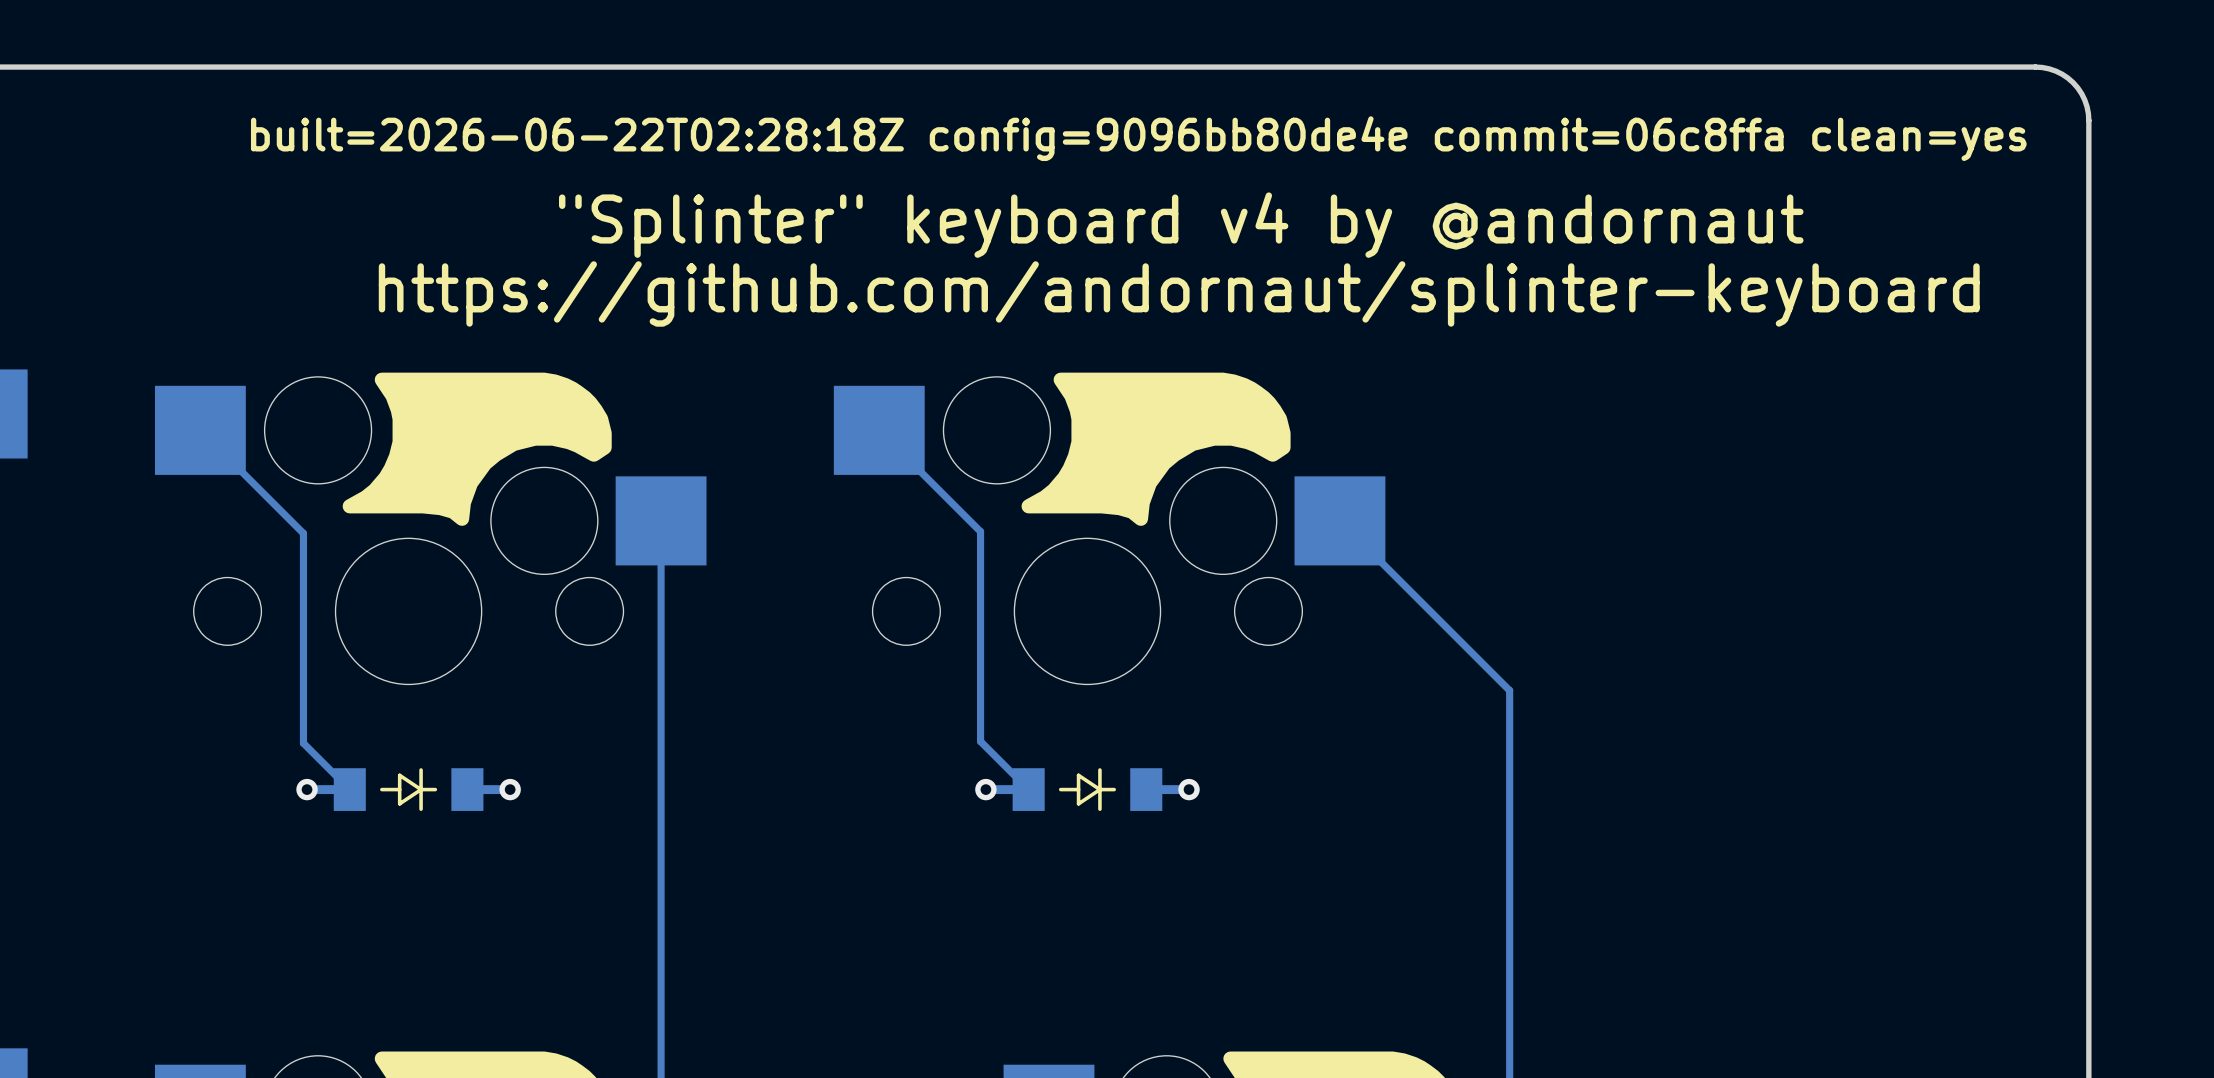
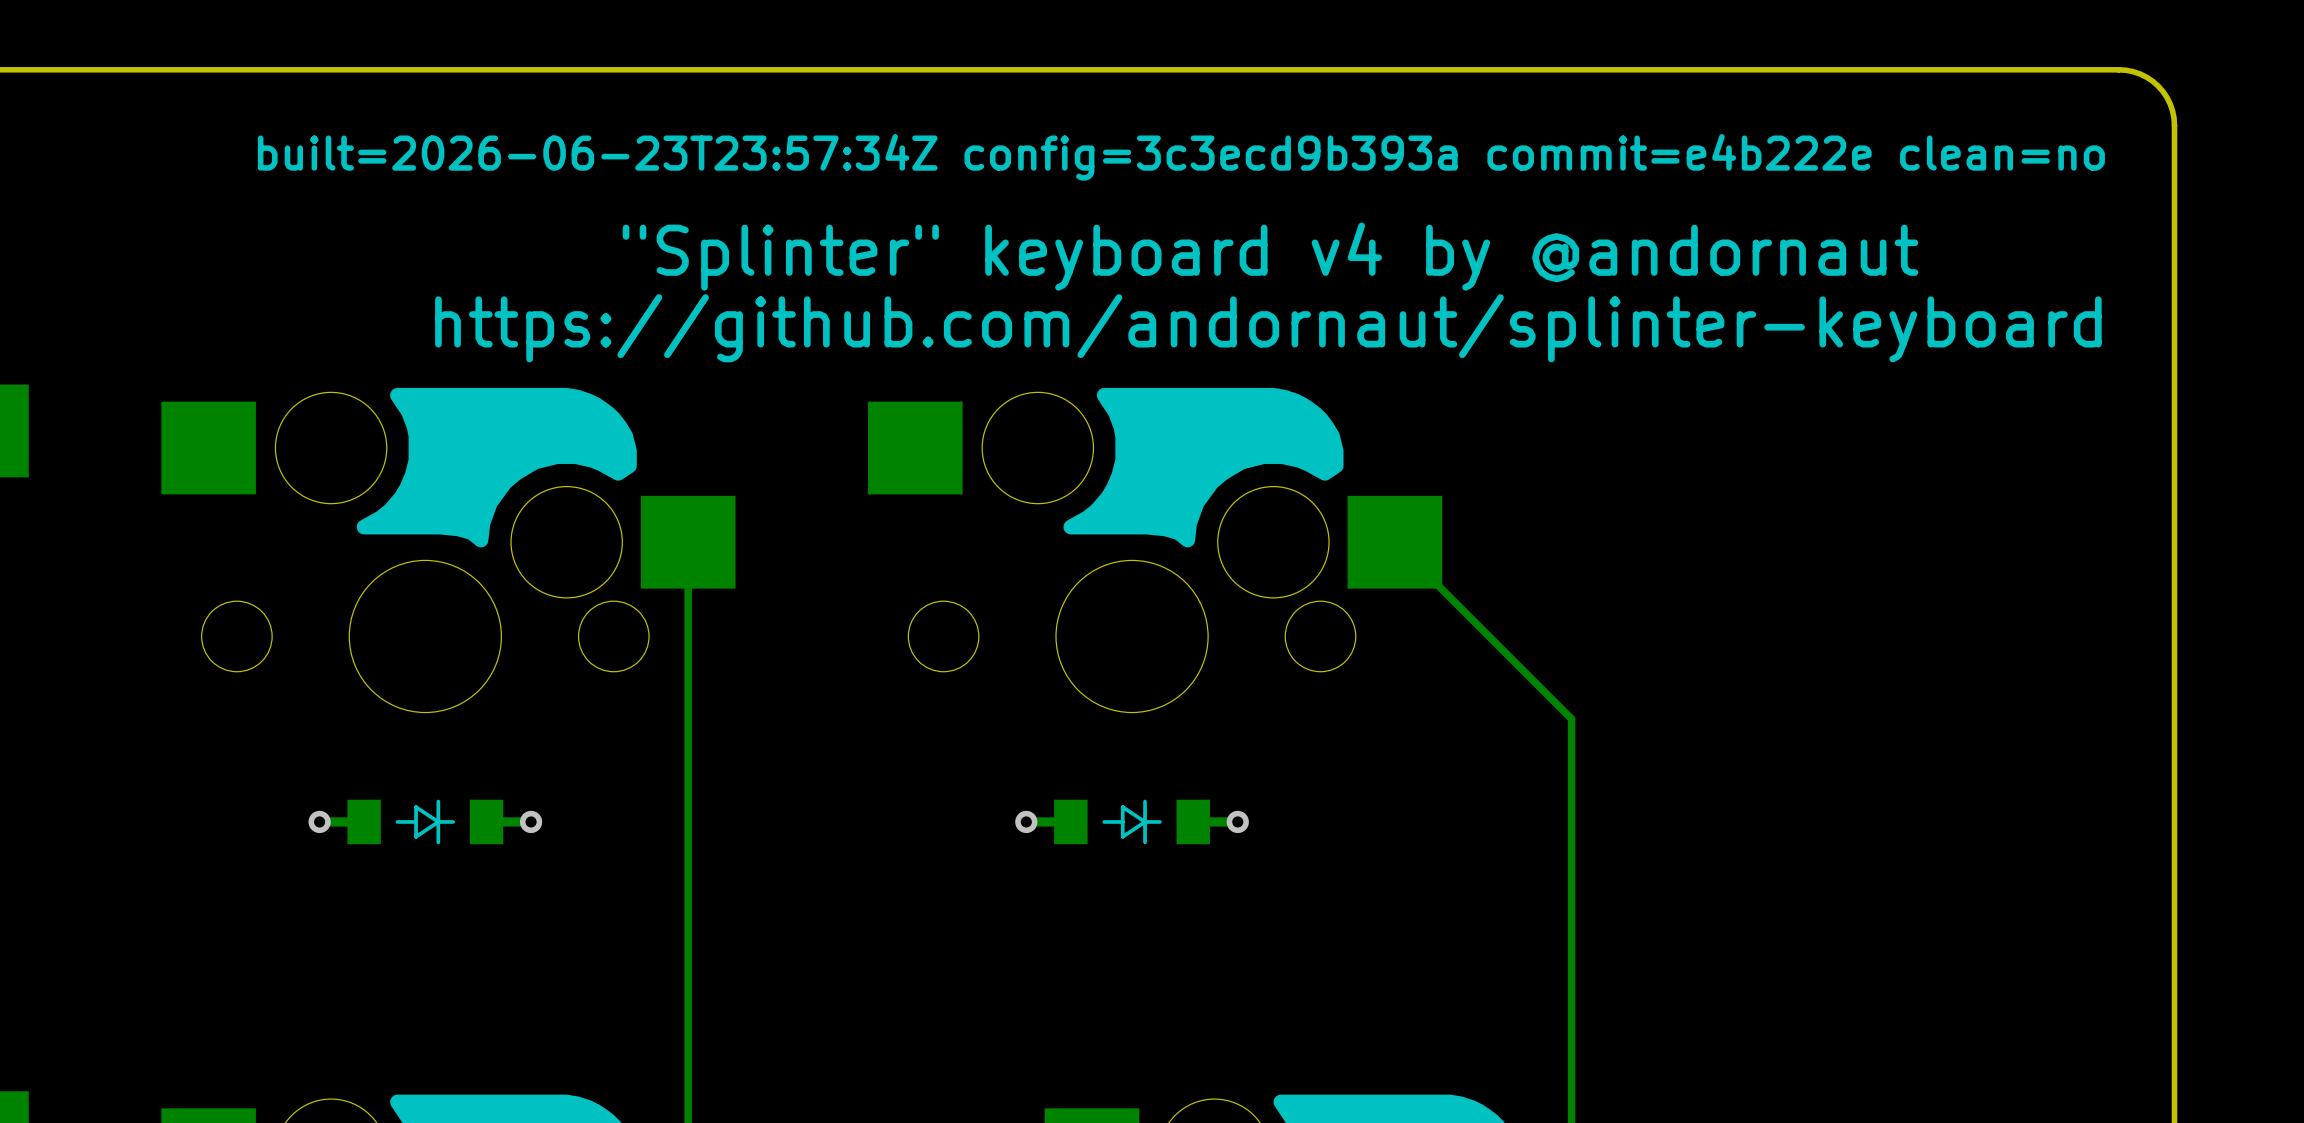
text: built=2026-06-22T02:28:18Z config=9096bb80de4e commit=06c8ffa clean=yes (1138, 138) -> built=2026-06-23T23:57:34Z config=3c3ecd9b393a commit=e4b222e clean=no (1181, 157)
text position: "Splinter" keyboard v4 by @andornaut (1181, 225) -> "Splinter" keyboard v4 by @andornaut (1270, 256)
text position: https://github.com/andornaut/splinter-keyboard (1179, 293) -> https://github.com/andornaut/splinter-keyboard (1268, 328)
track: (200, 430) (303, 533) (303, 743) (349, 789) -> none
track: (879, 430) (980, 531) (980, 741) (1028, 789) -> none

